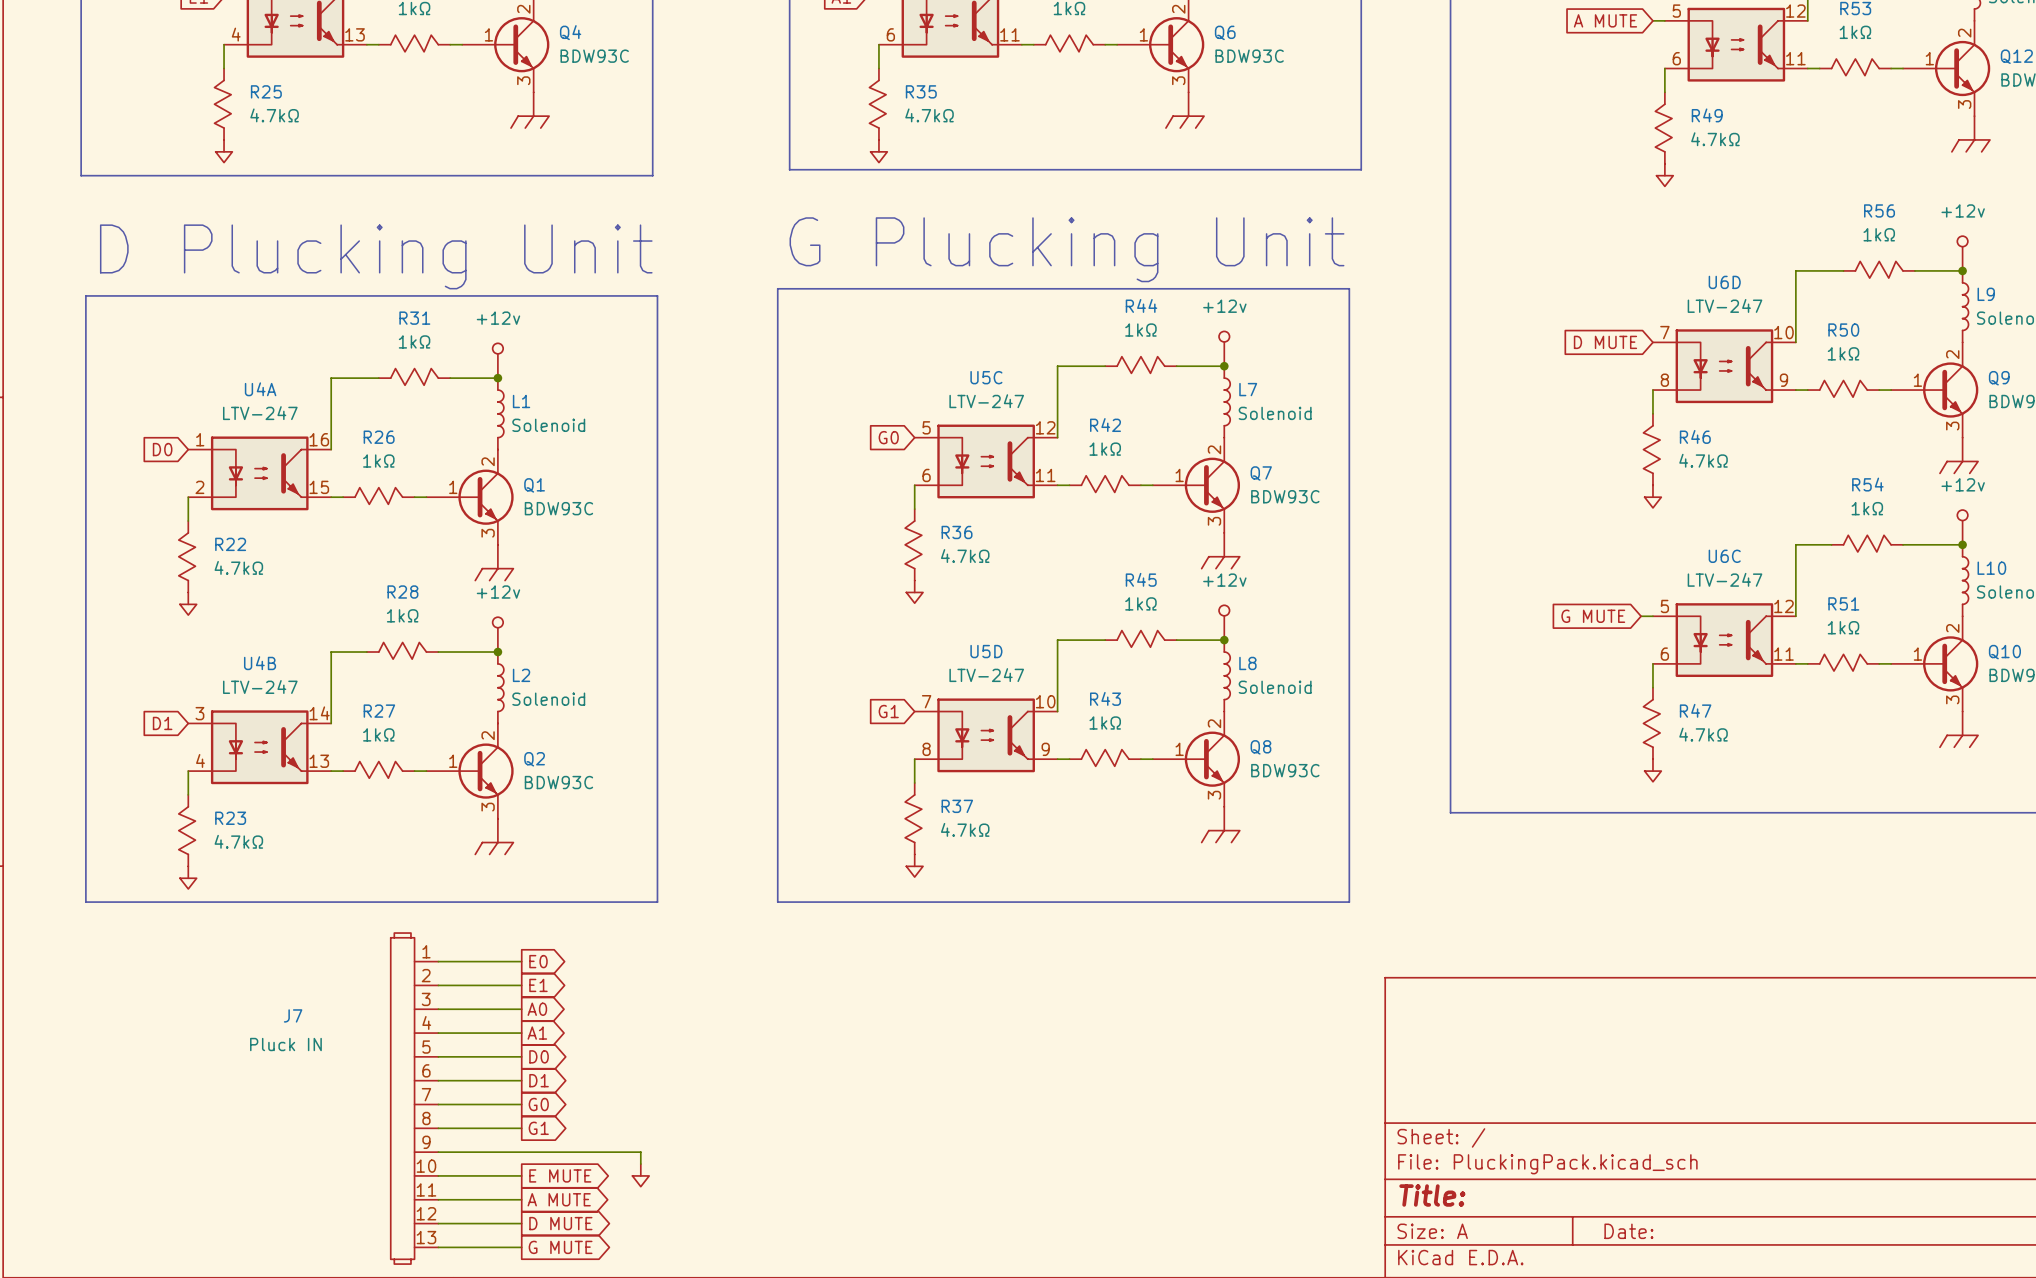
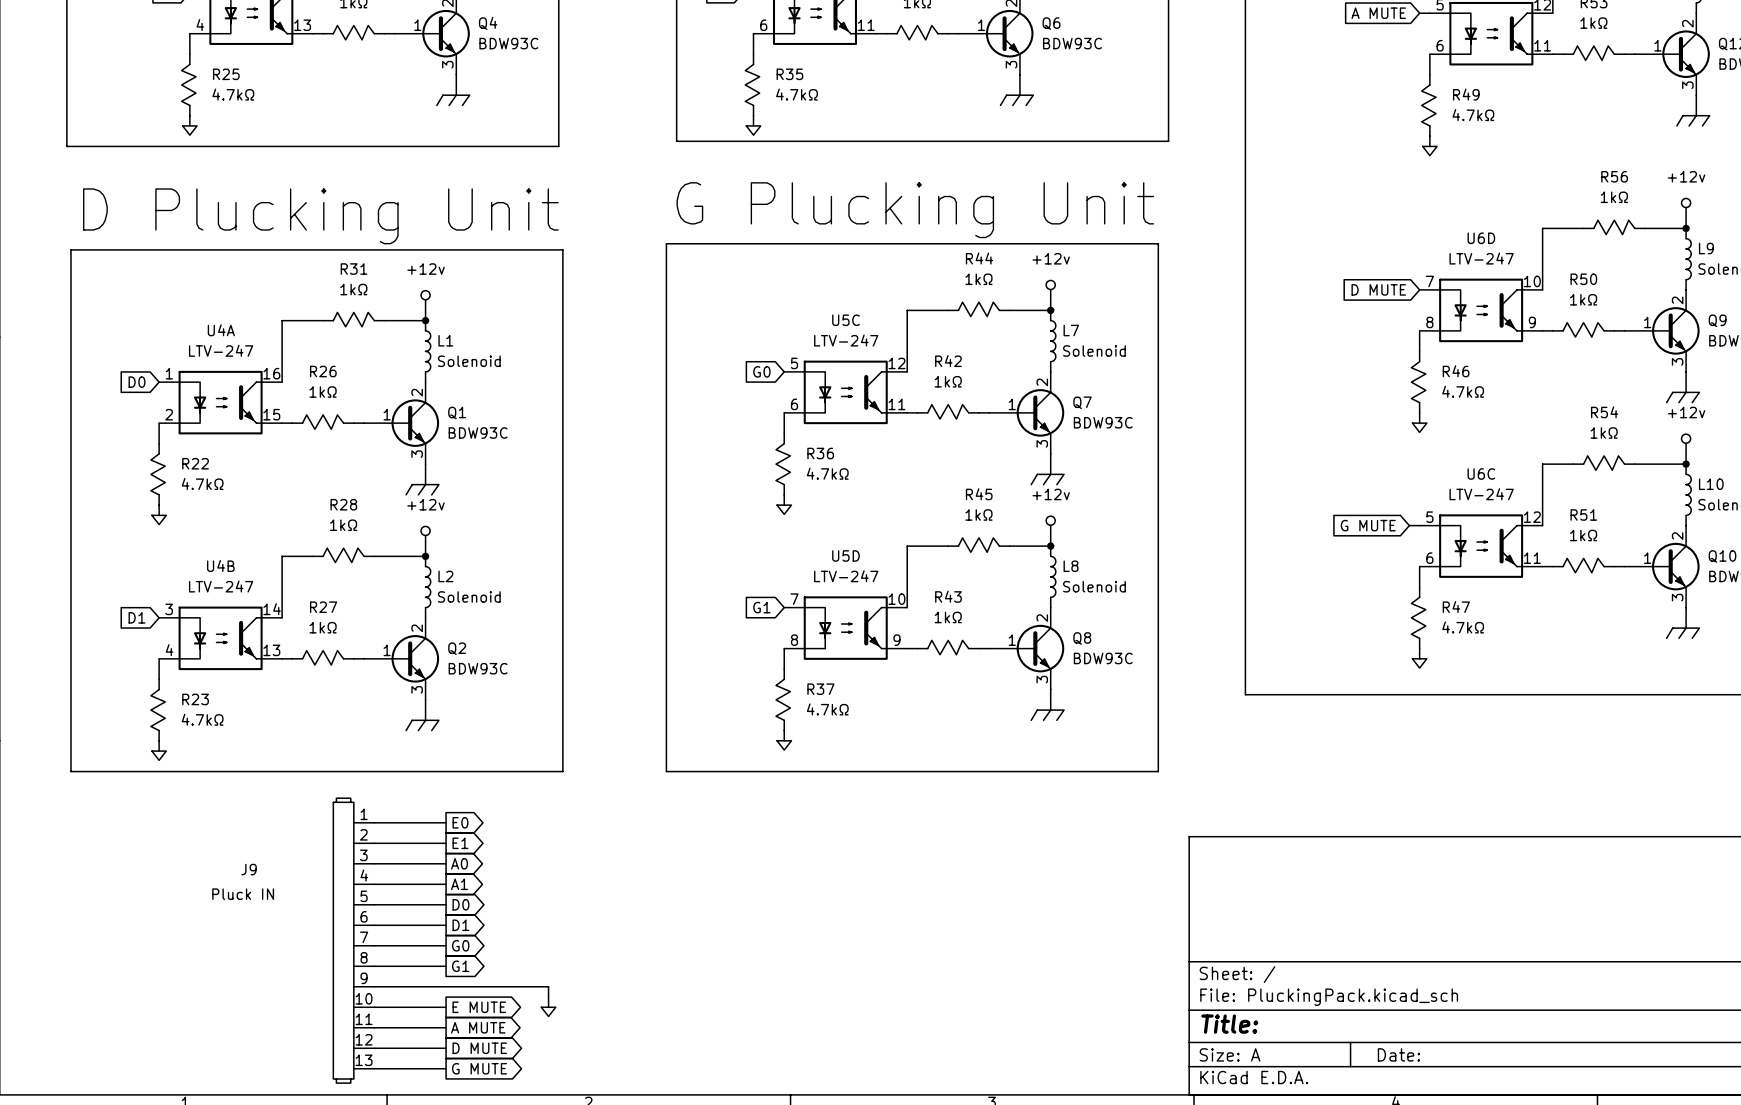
J7 name: J7 (293, 1015) -> J9 (249, 869)

